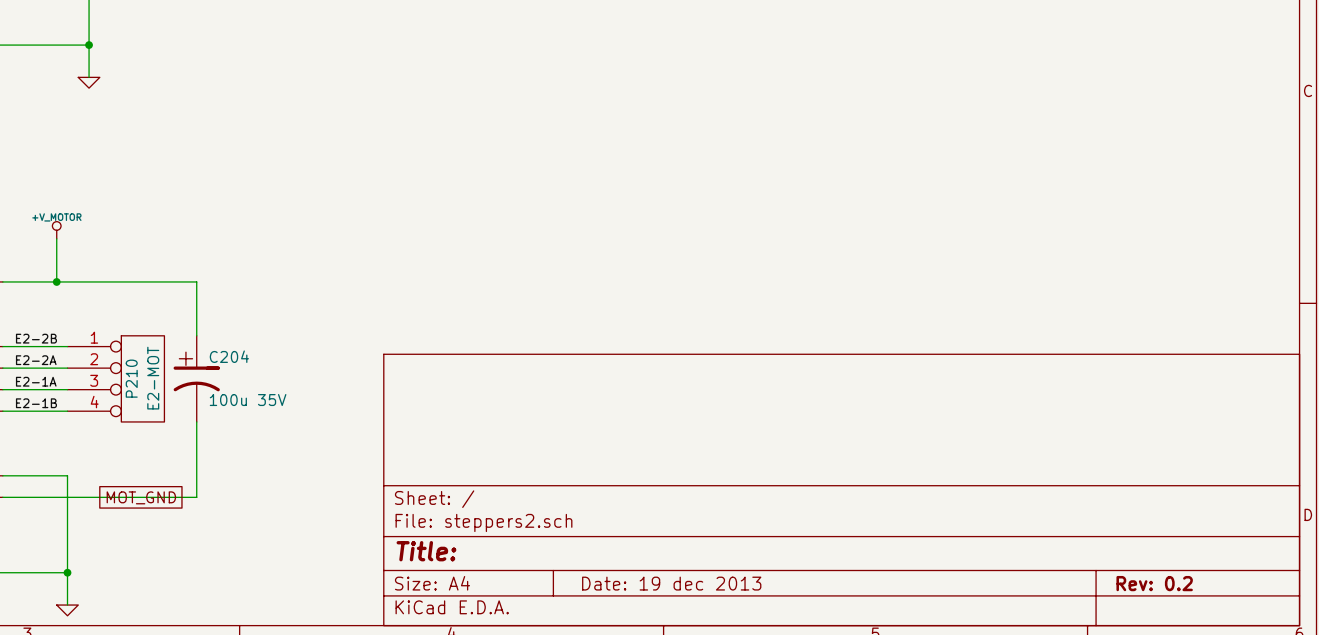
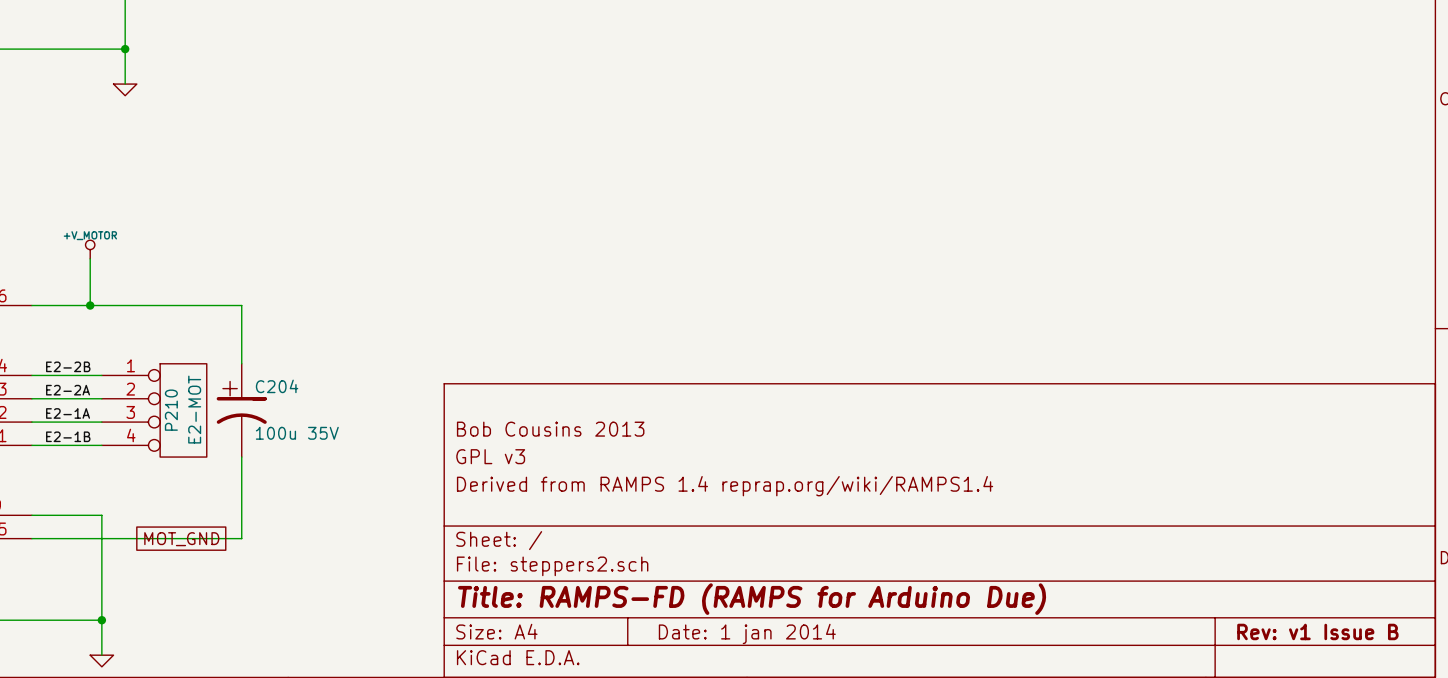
title block: none -> Bob Cousins 2013 (550, 429)
title block: none -> GPL v3 (490, 456)
title block: none -> Derived from RAMPS 1.4 reprap.org/wiki/RAMPS1.4 (725, 486)
title block: Title: (426, 551) -> Title: RAMPS-FD (RAMPS for Arduino Due) (752, 599)
title block: Date: 19 dec 2013 (671, 583) -> Date: 1 jan 2014 (747, 633)
title block: Rev: 0.2 (1154, 583) -> Rev: v1 Issue B (1317, 631)

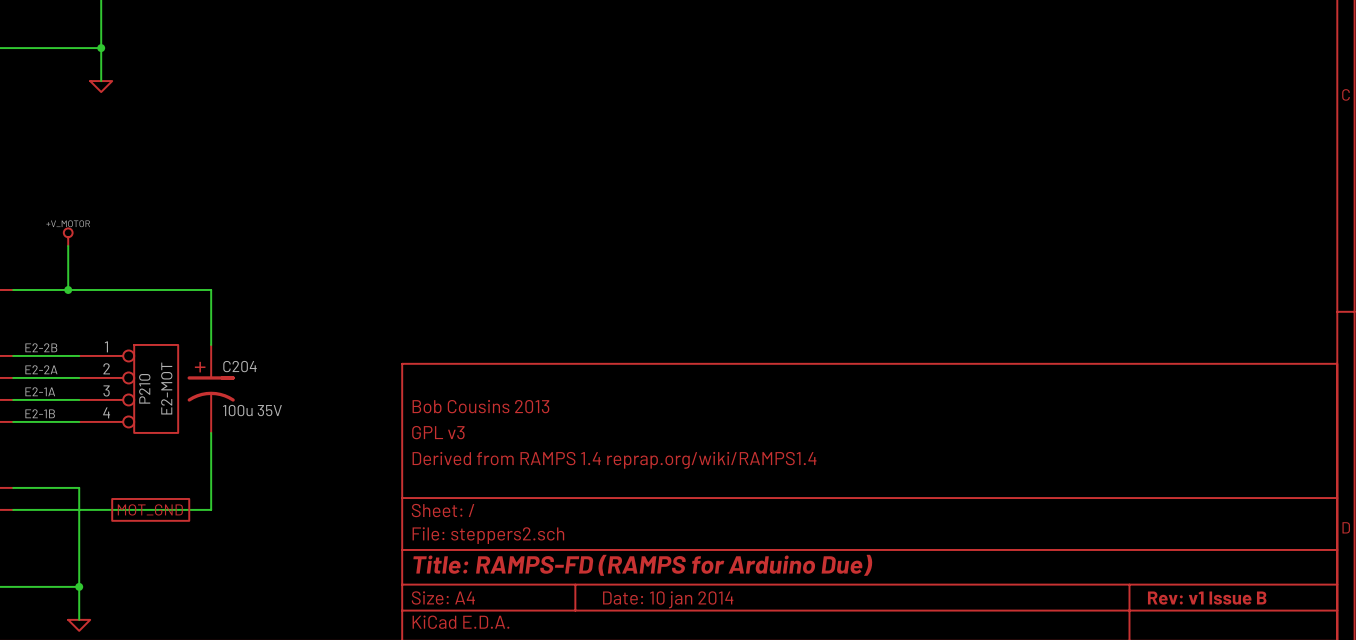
title block: Date: 1 jan 2014 (747, 633) -> Date: 10 jan 2014 (668, 599)

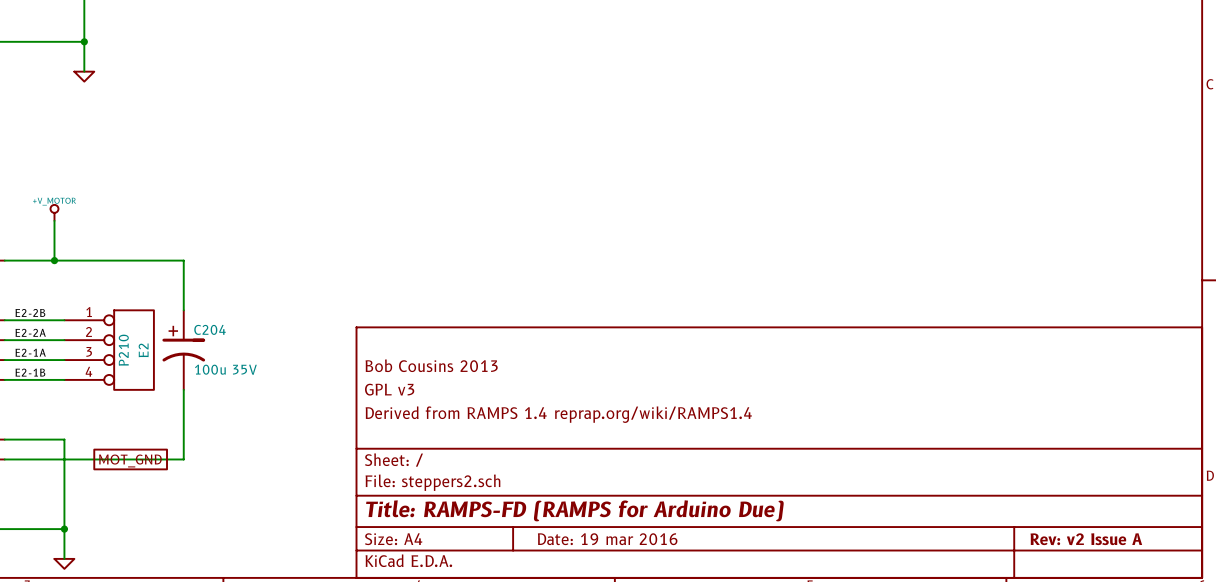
P210 value: E2-MOT (166, 388) -> E2 (143, 350)
title block: Rev: v1 Issue B (1207, 598) -> Rev: v2 Issue A (1086, 539)
title block: Date: 10 jan 2014 (668, 599) -> Date: 19 mar 2016 (607, 539)

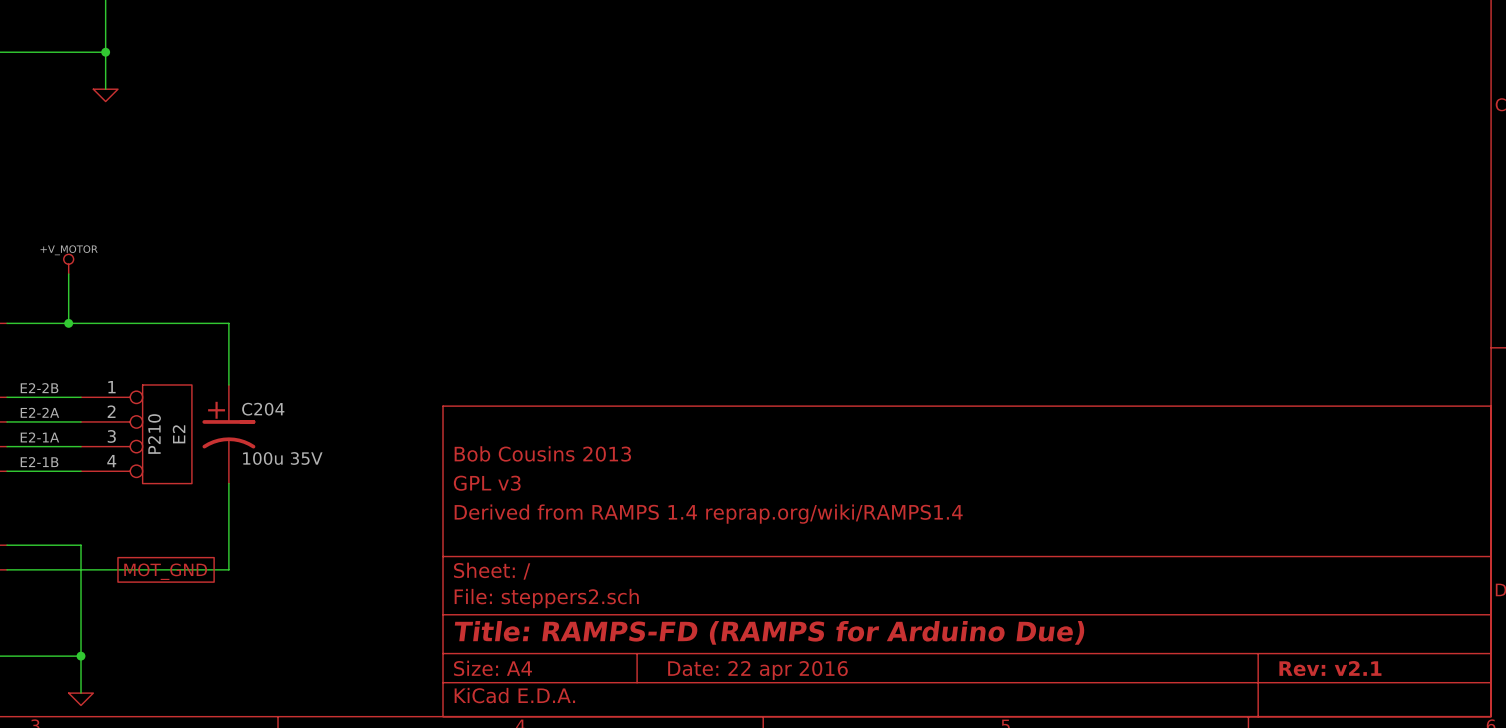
title block: Date: 19 mar 2016 (607, 539) -> Date: 22 apr 2016 (757, 670)
title block: Rev: v2 Issue A (1086, 539) -> Rev: v2.1 (1330, 668)

